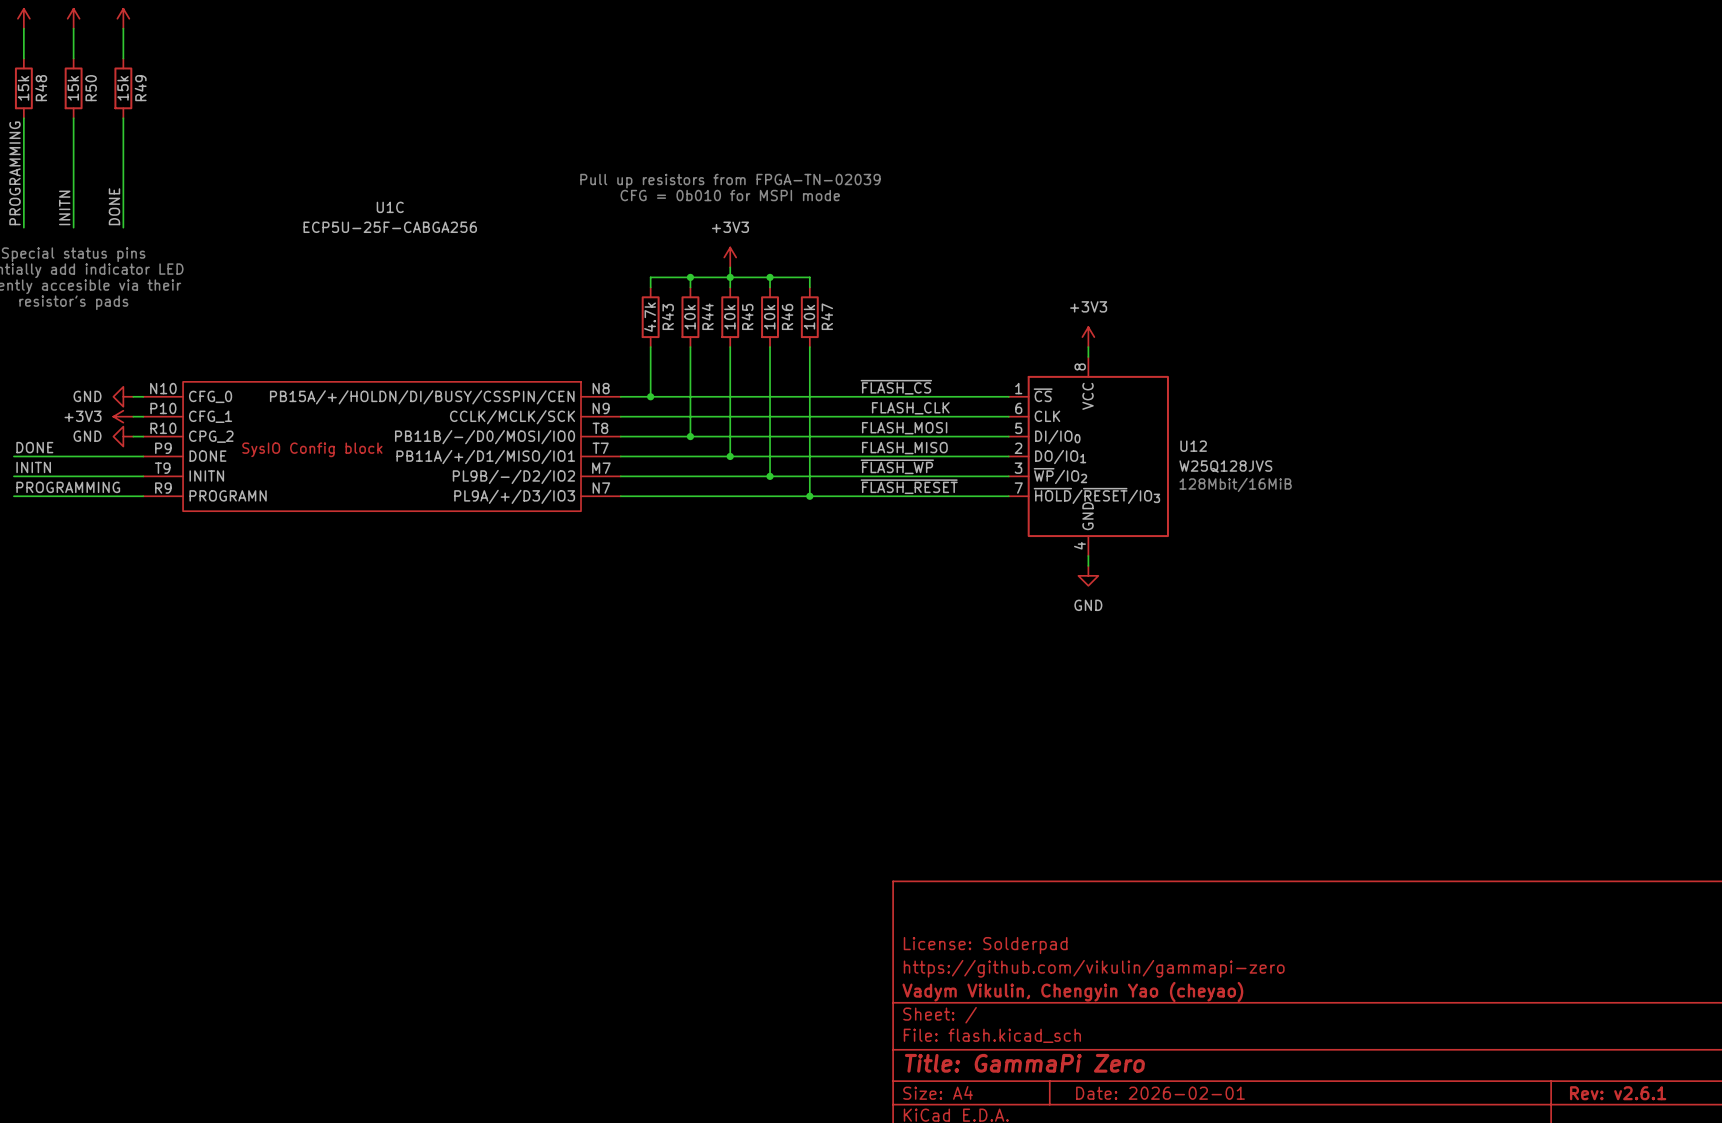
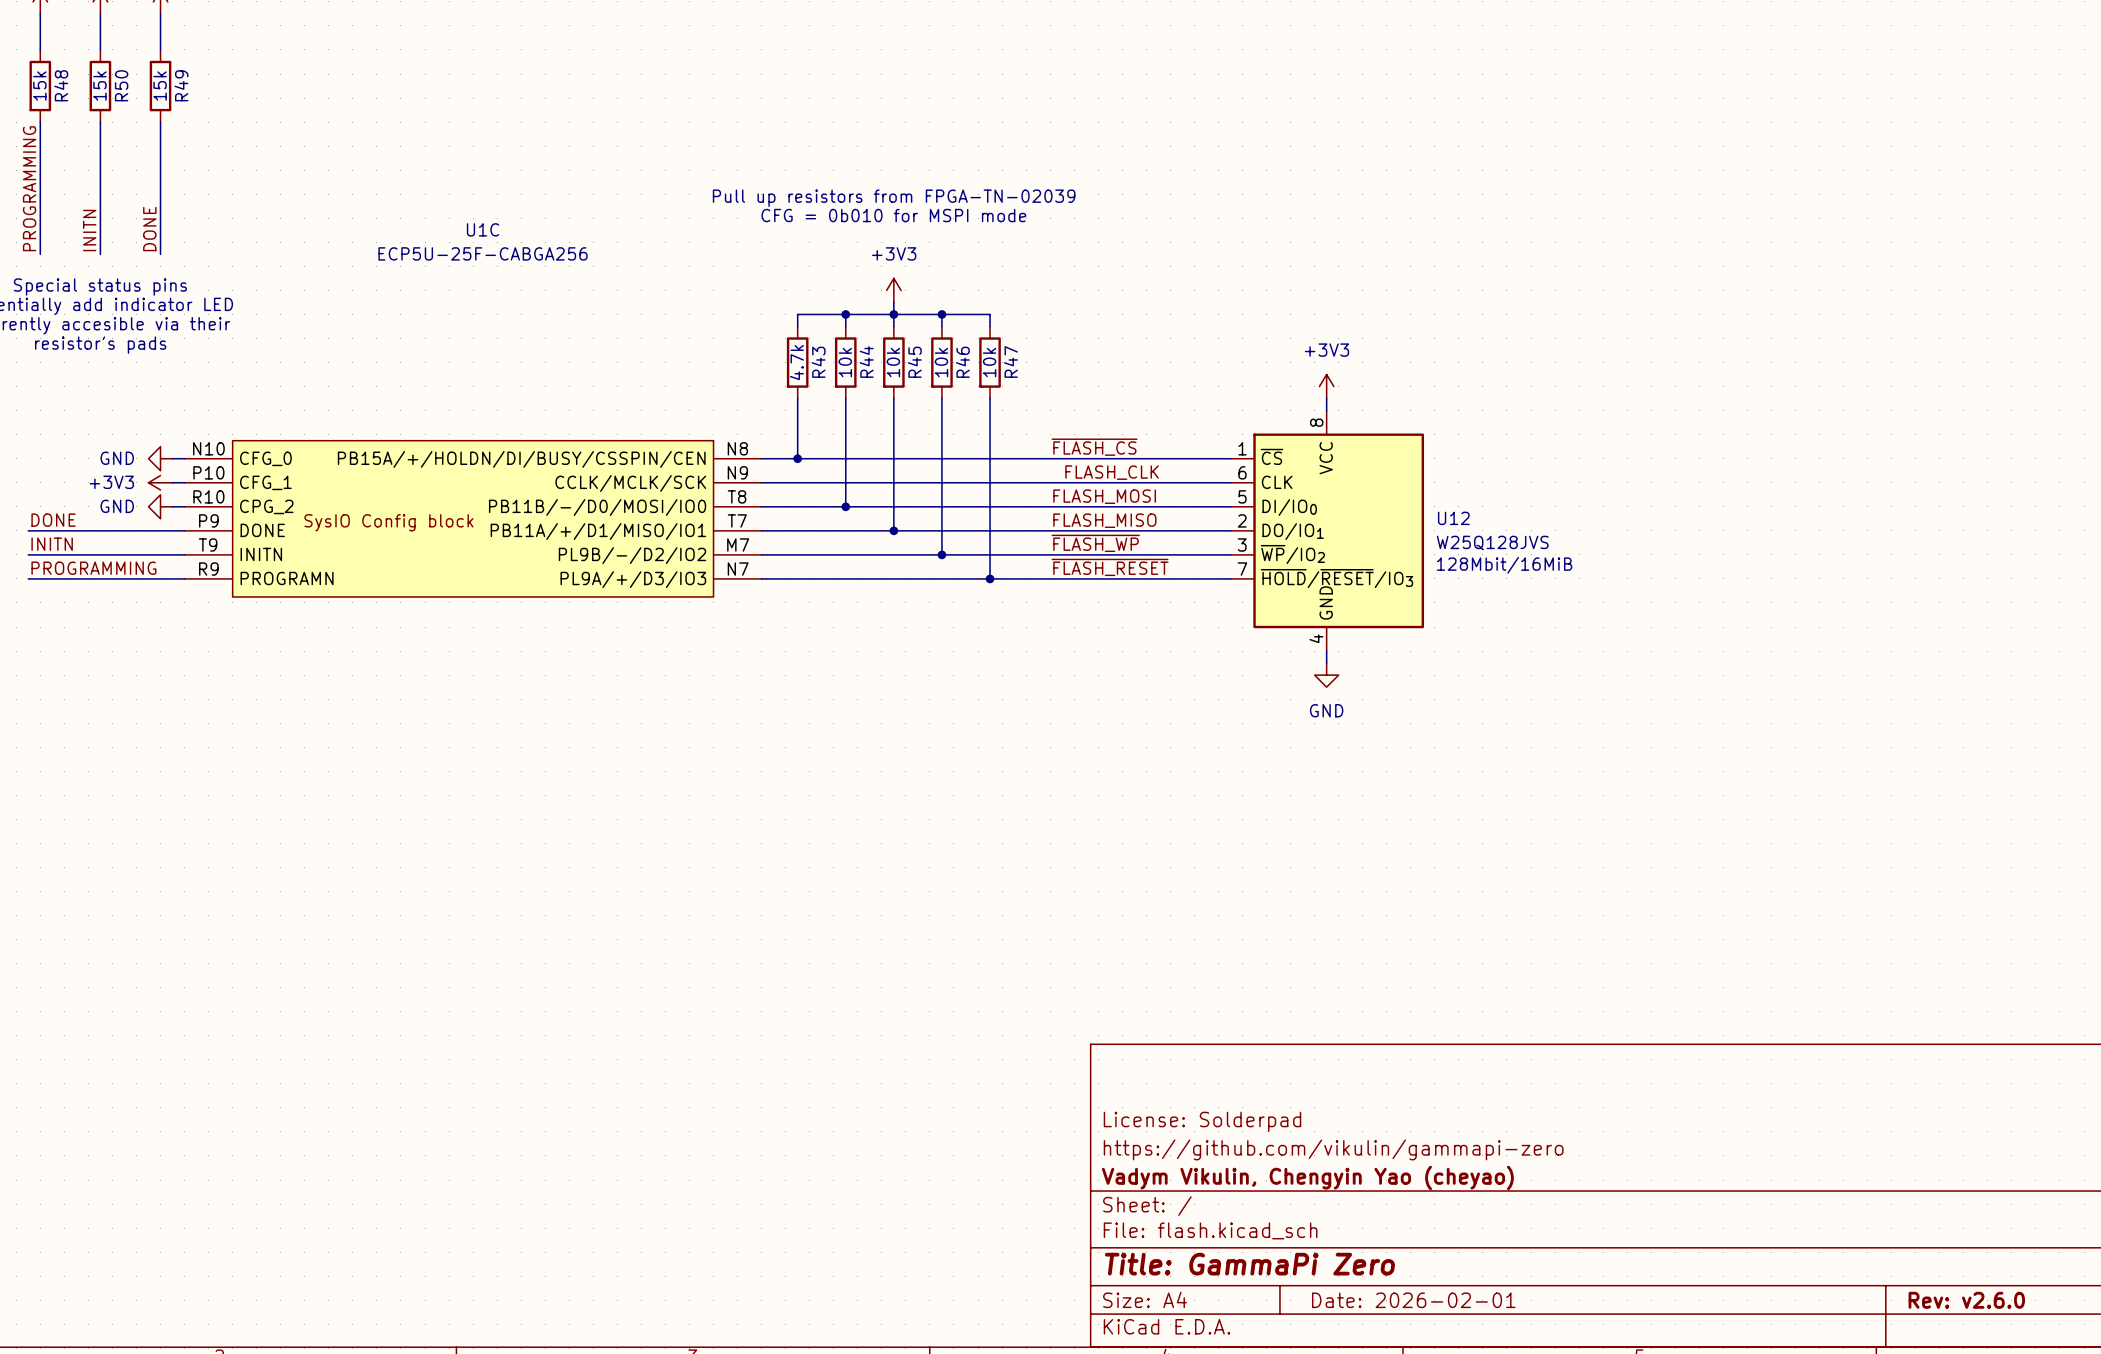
title block: Rev: v2.6.1 (1618, 1093) -> Rev: v2.6.0 (1966, 1300)

